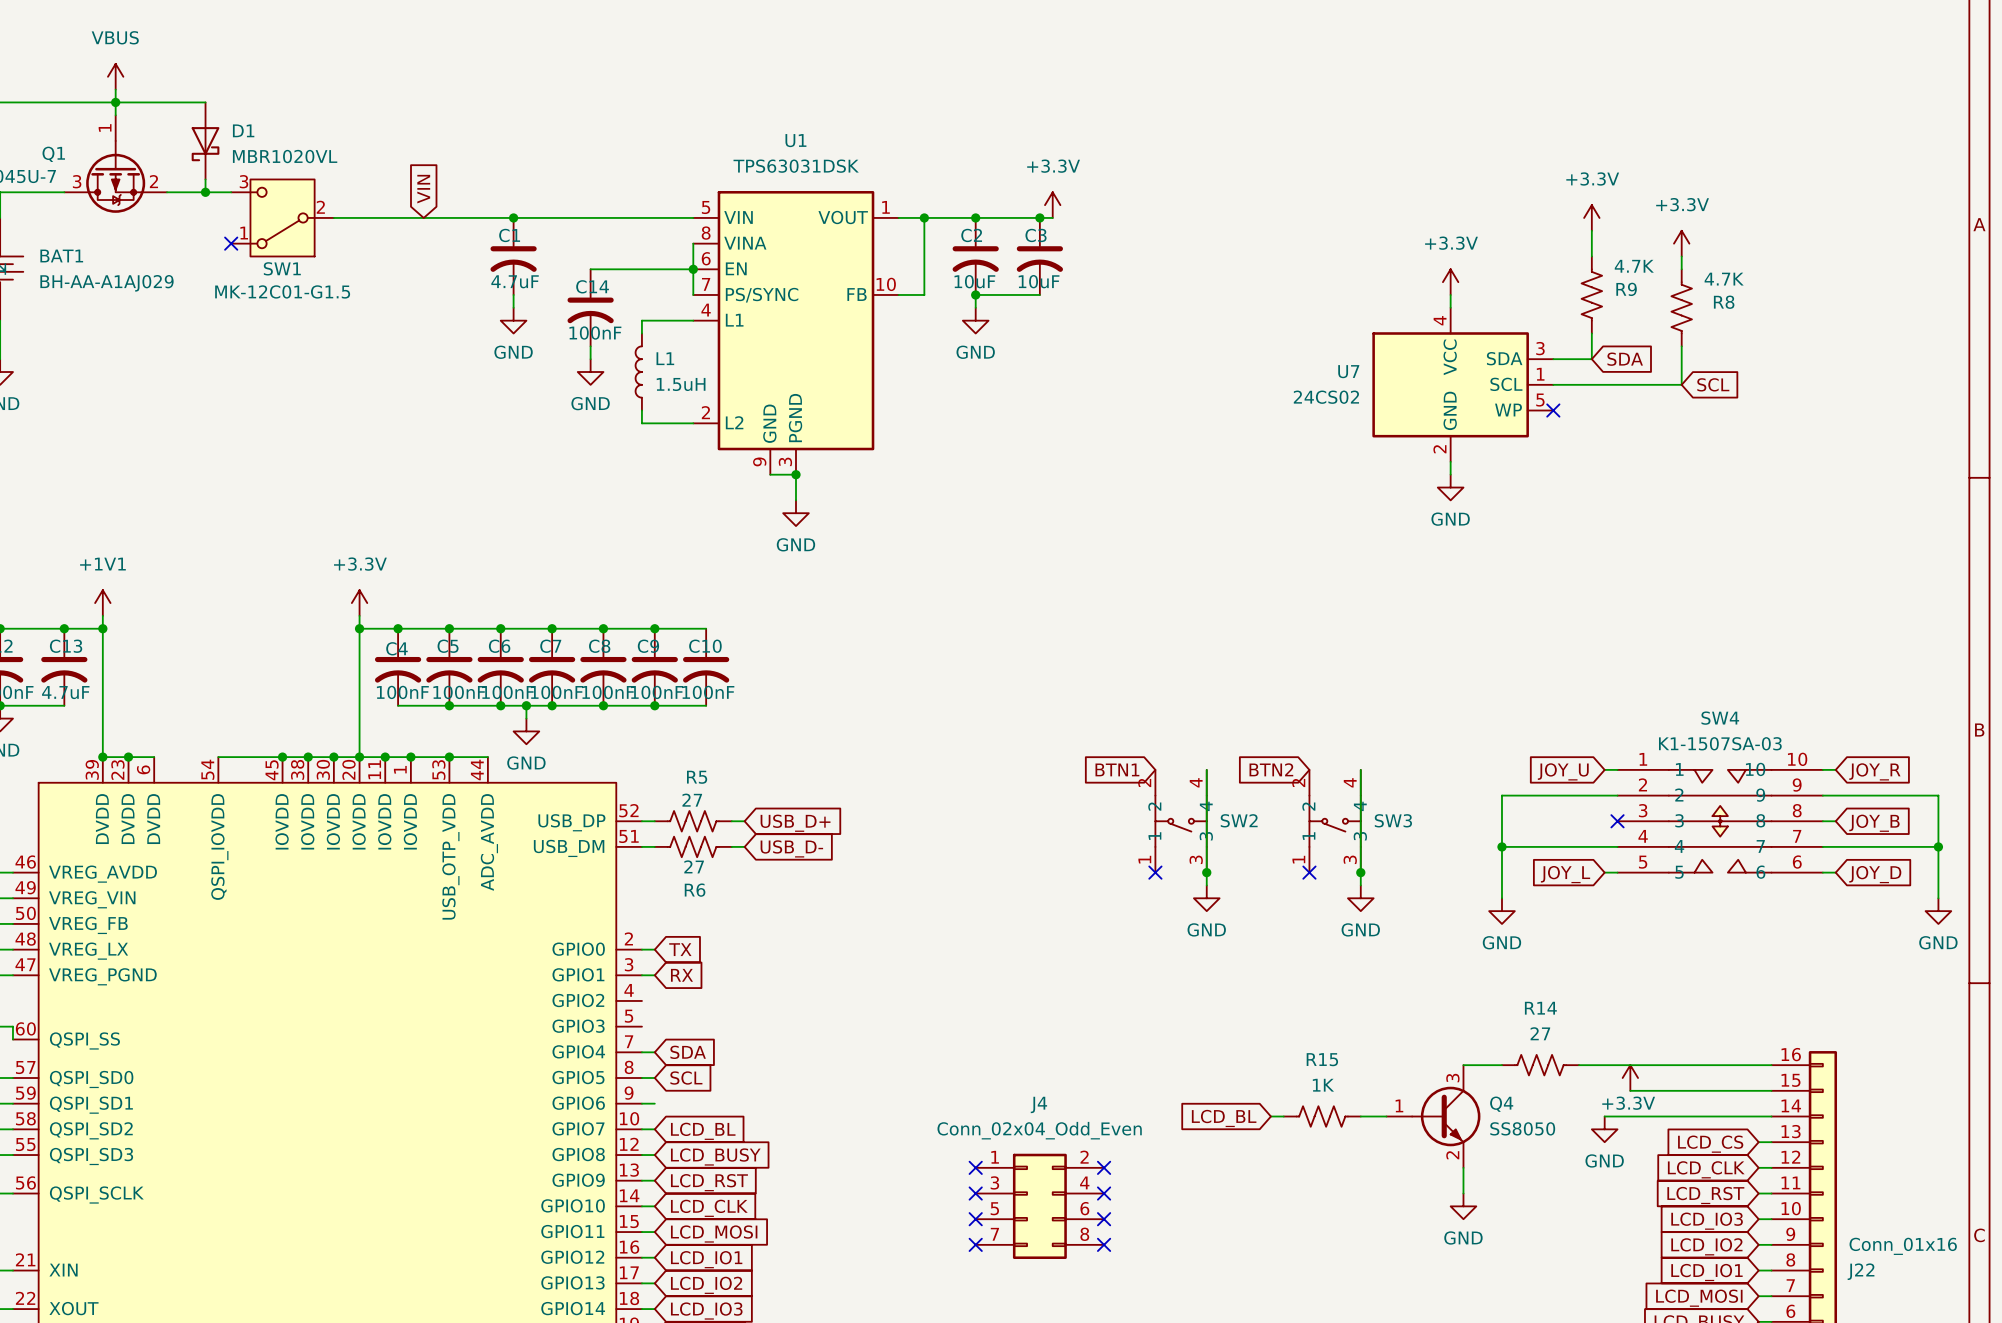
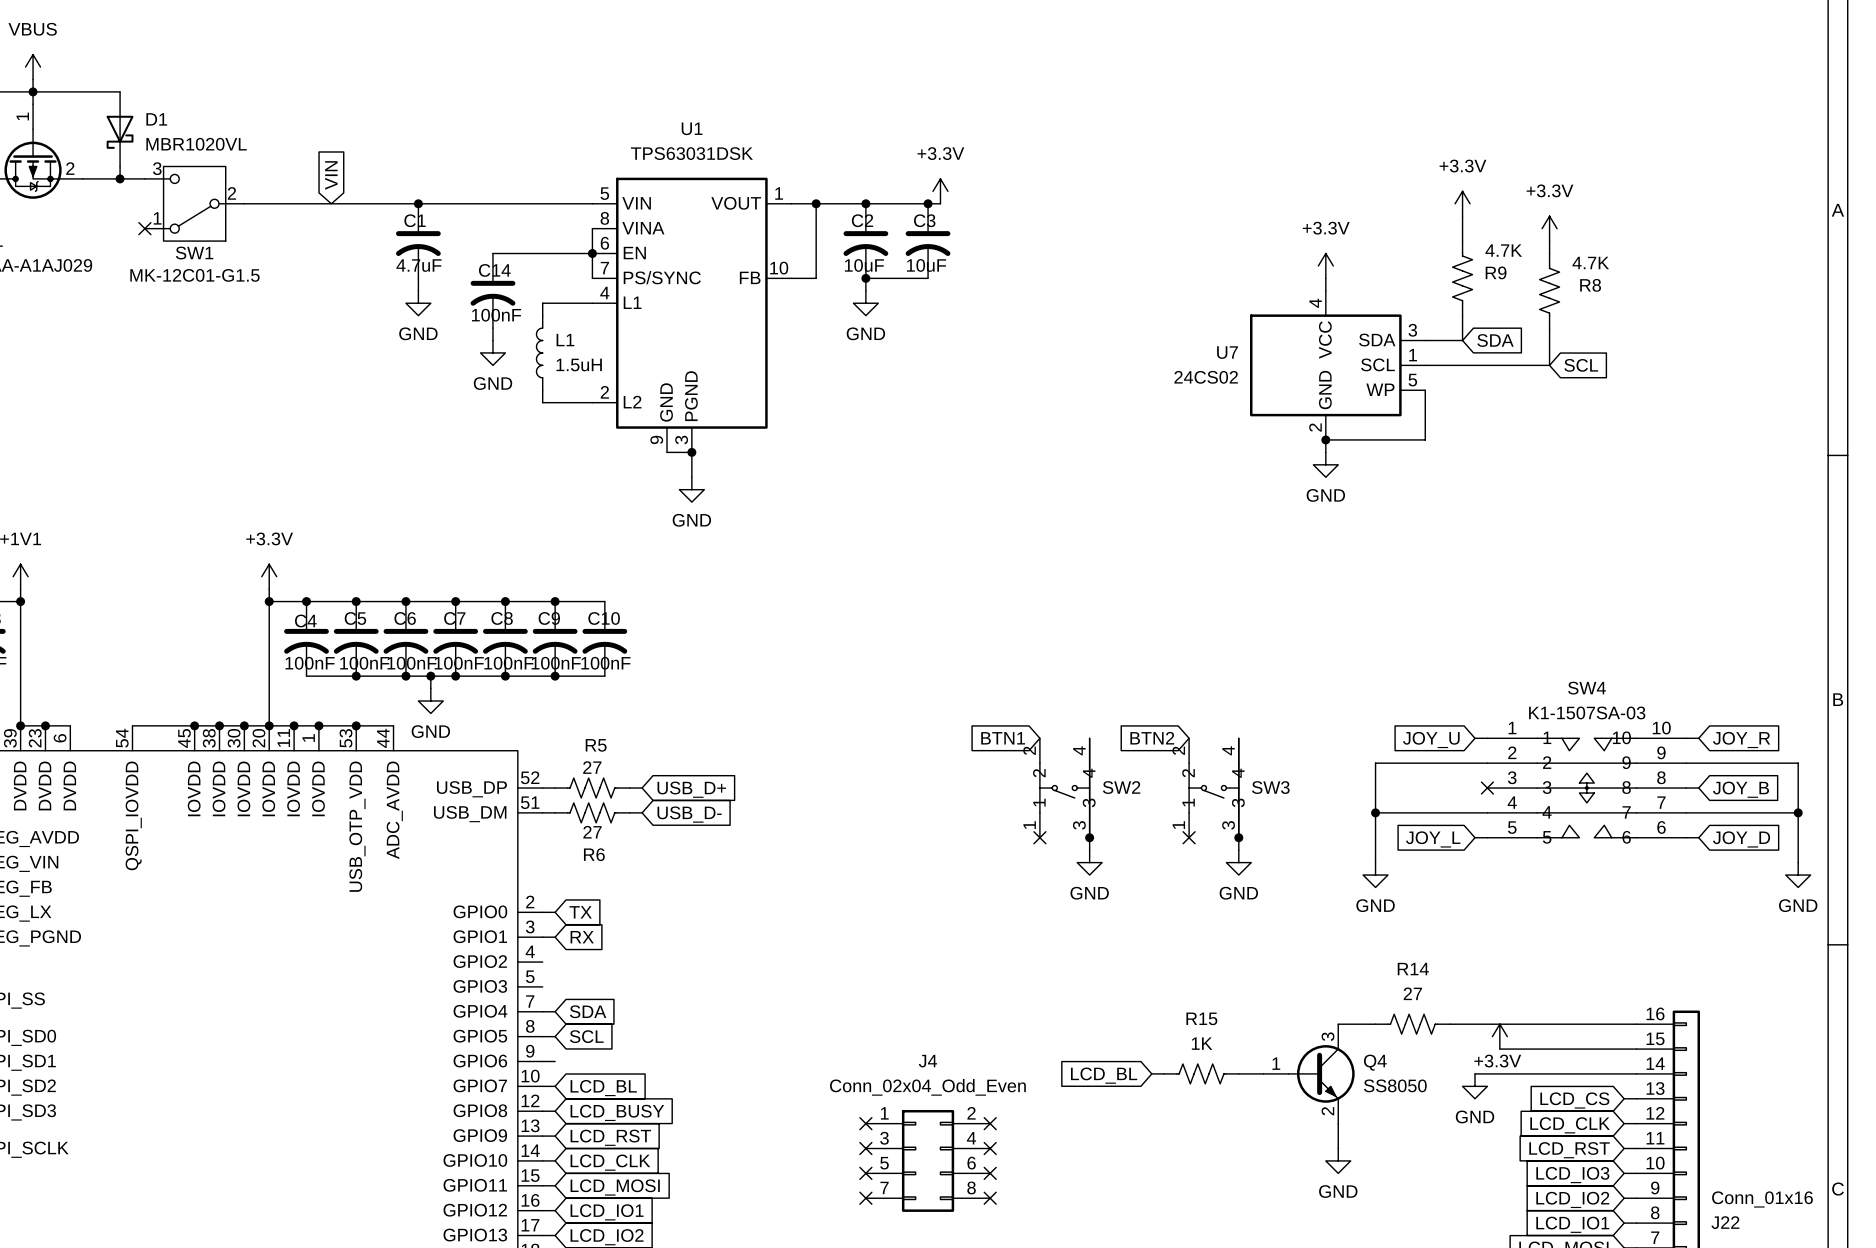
wire: none -> (1425, 390) (1425, 439) (1325, 439)
no-connect mark: (1553, 410) -> none
junction: none -> (1325, 439)

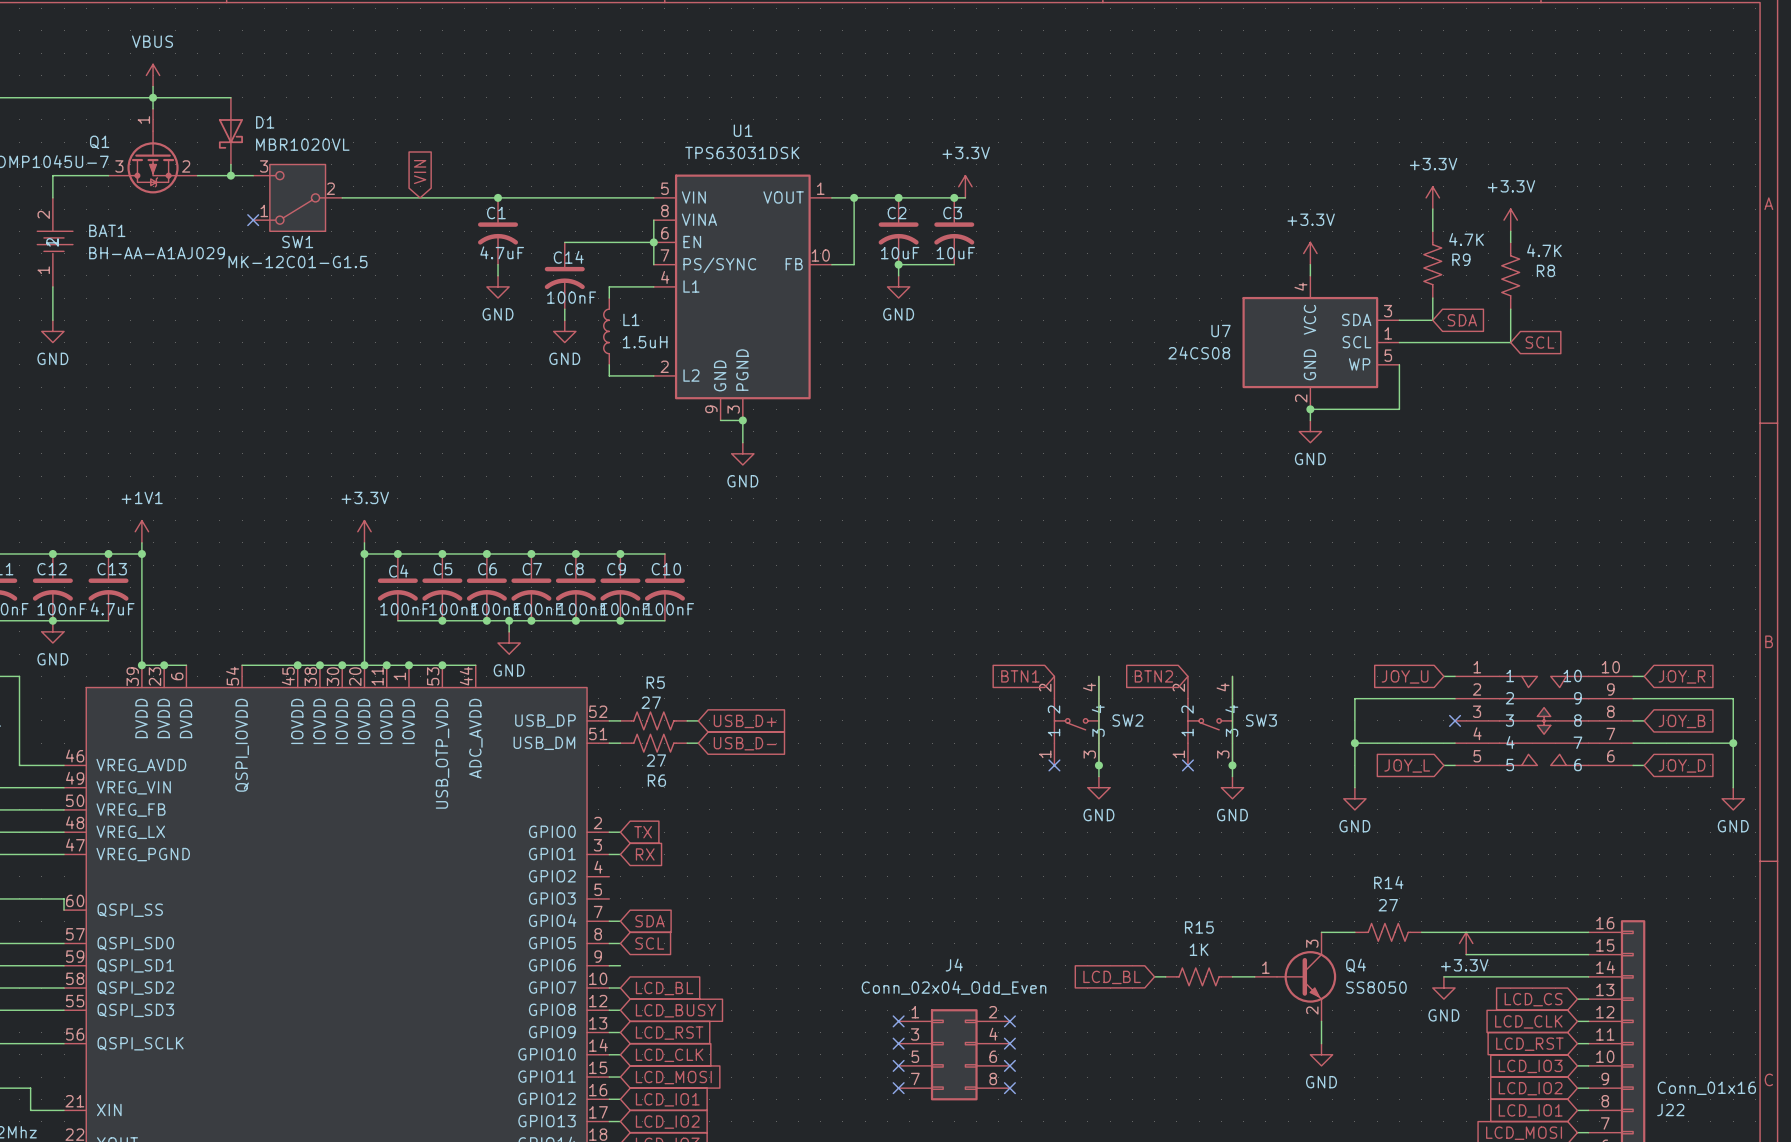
U7 value: 24CS02 (1206, 377) -> 24CS08 (1199, 353)
SW4 name: SW4 (1587, 688) -> none
SW4 value: K1-1507SA-03 (1587, 712) -> none

